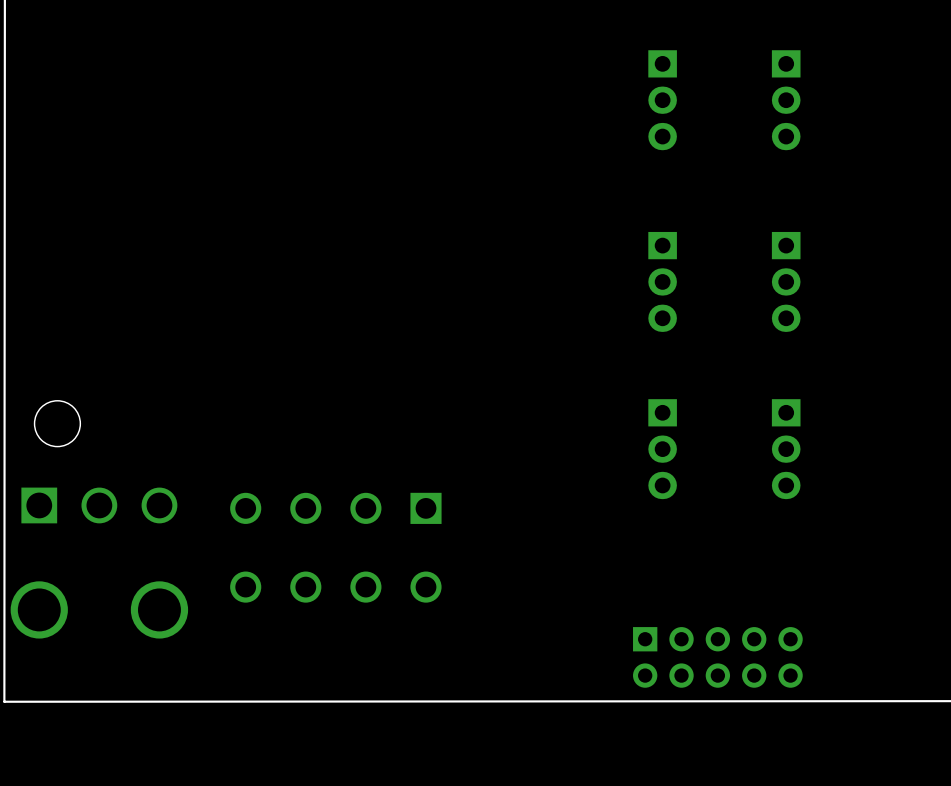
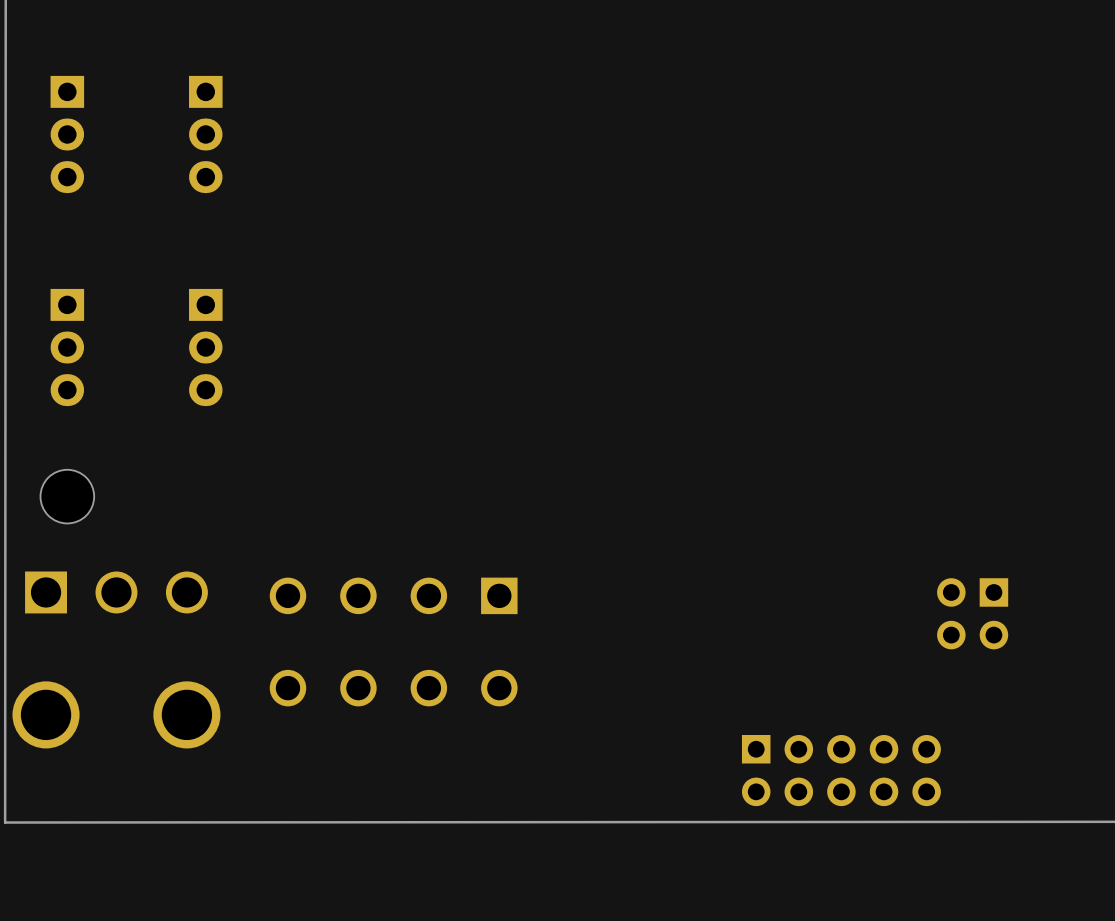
part: (662, 100) -> none
part: (786, 100) -> none
part: none -> (67, 134)
part: none -> (205, 134)
part: (662, 281) -> none
part: (786, 281) -> none
part: none -> (67, 347)
part: none -> (205, 347)
part: (662, 449) -> none
part: (786, 449) -> none
part: none -> (972, 613)

